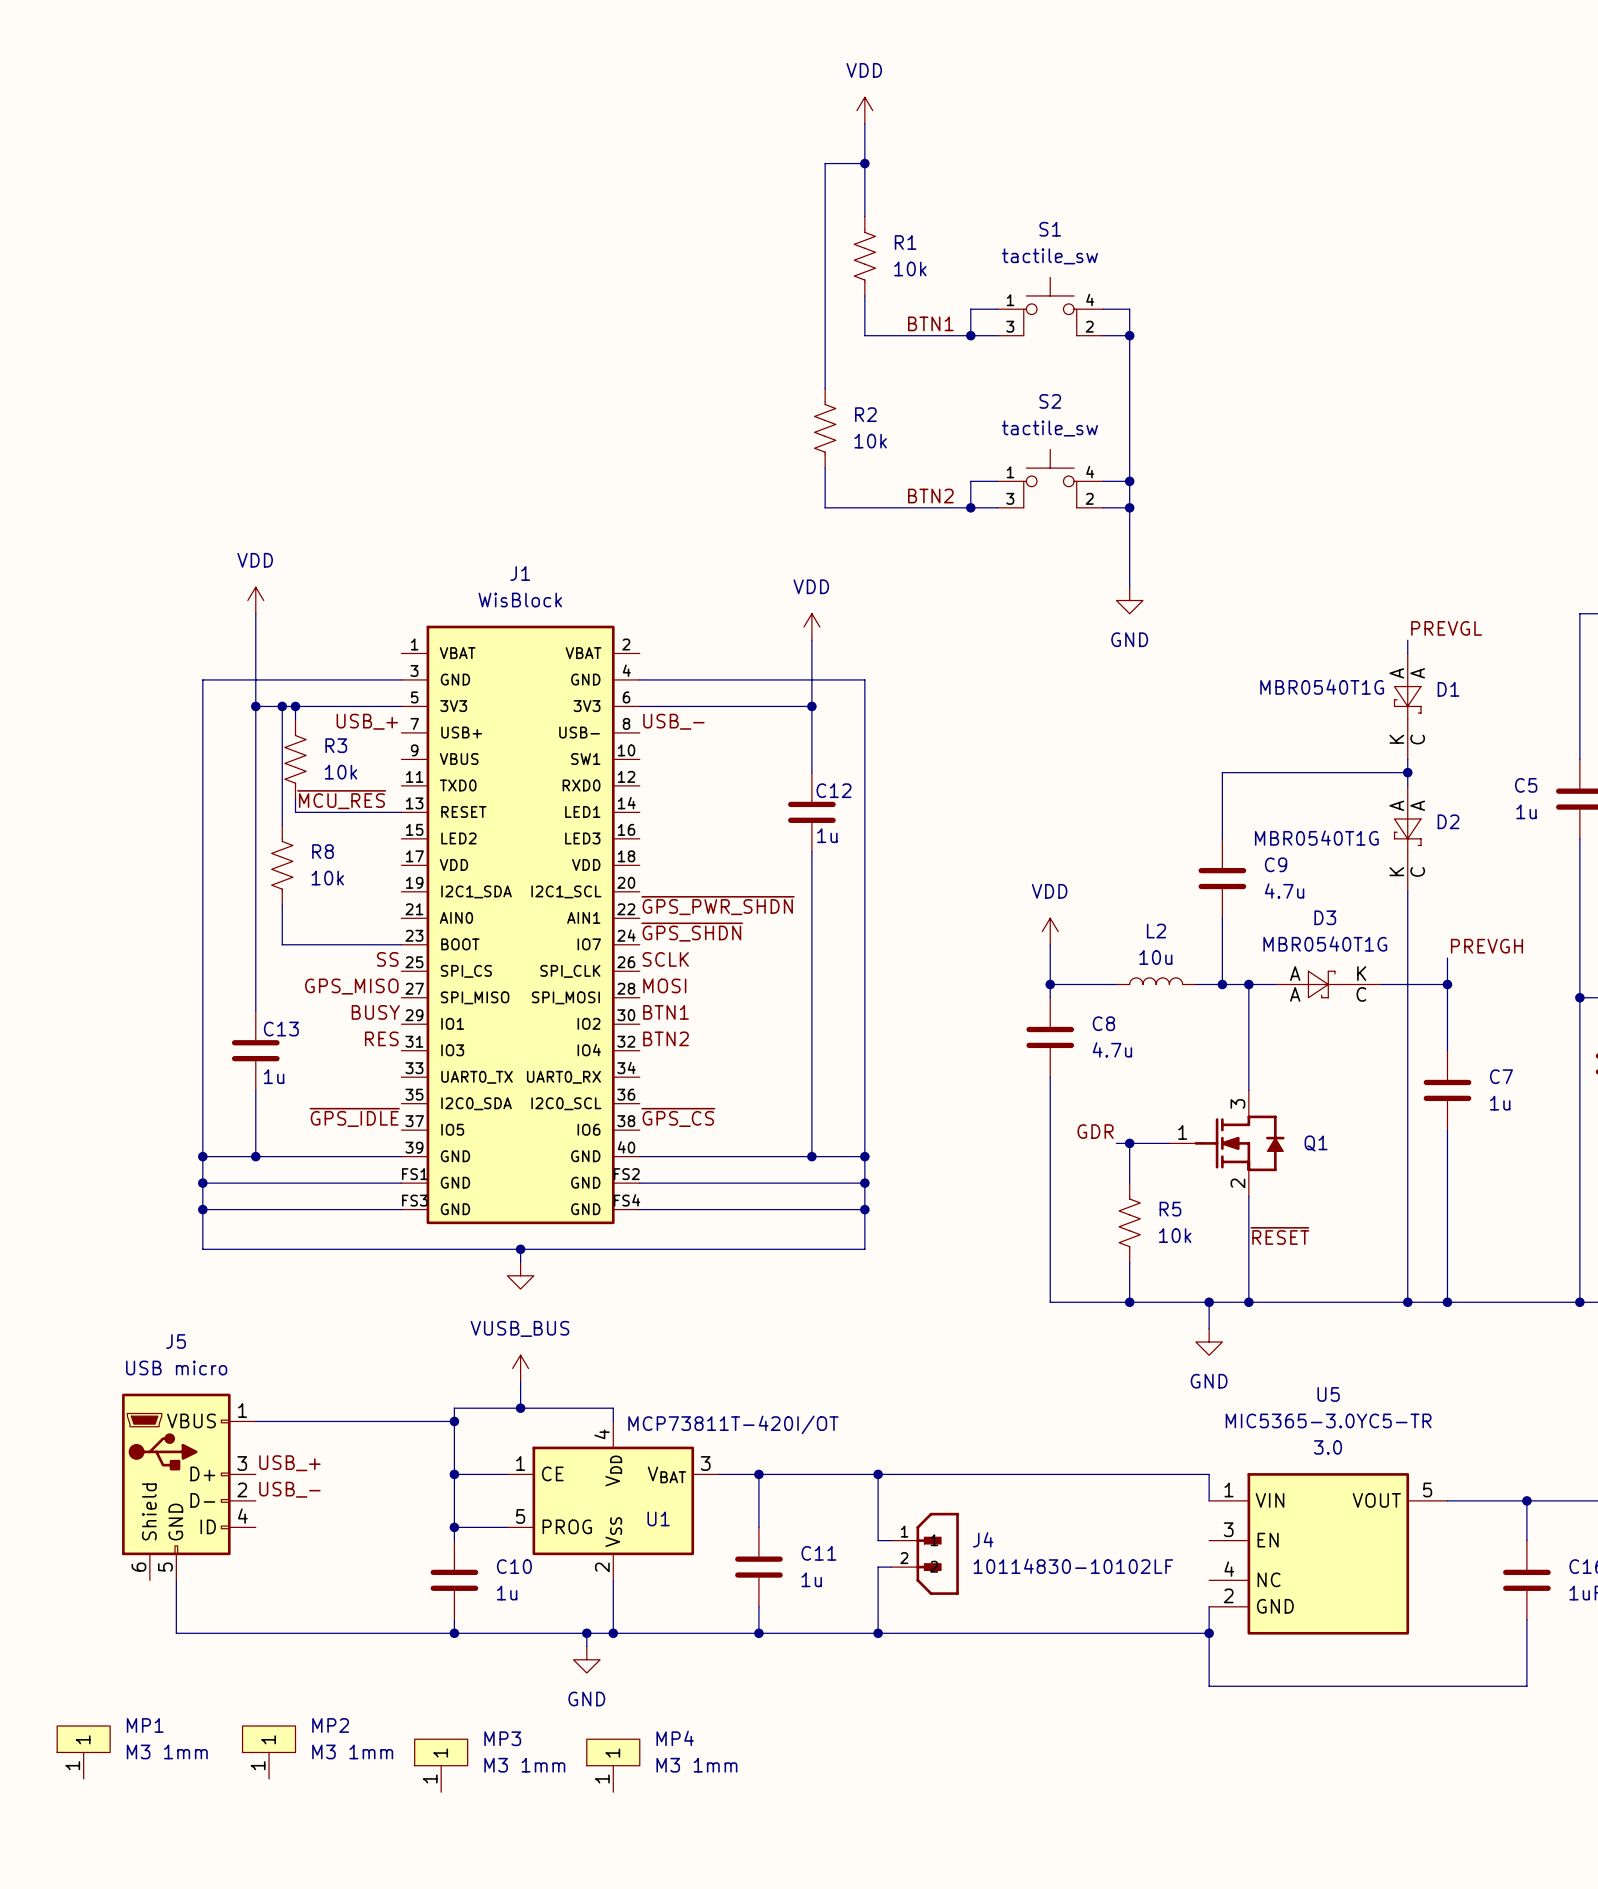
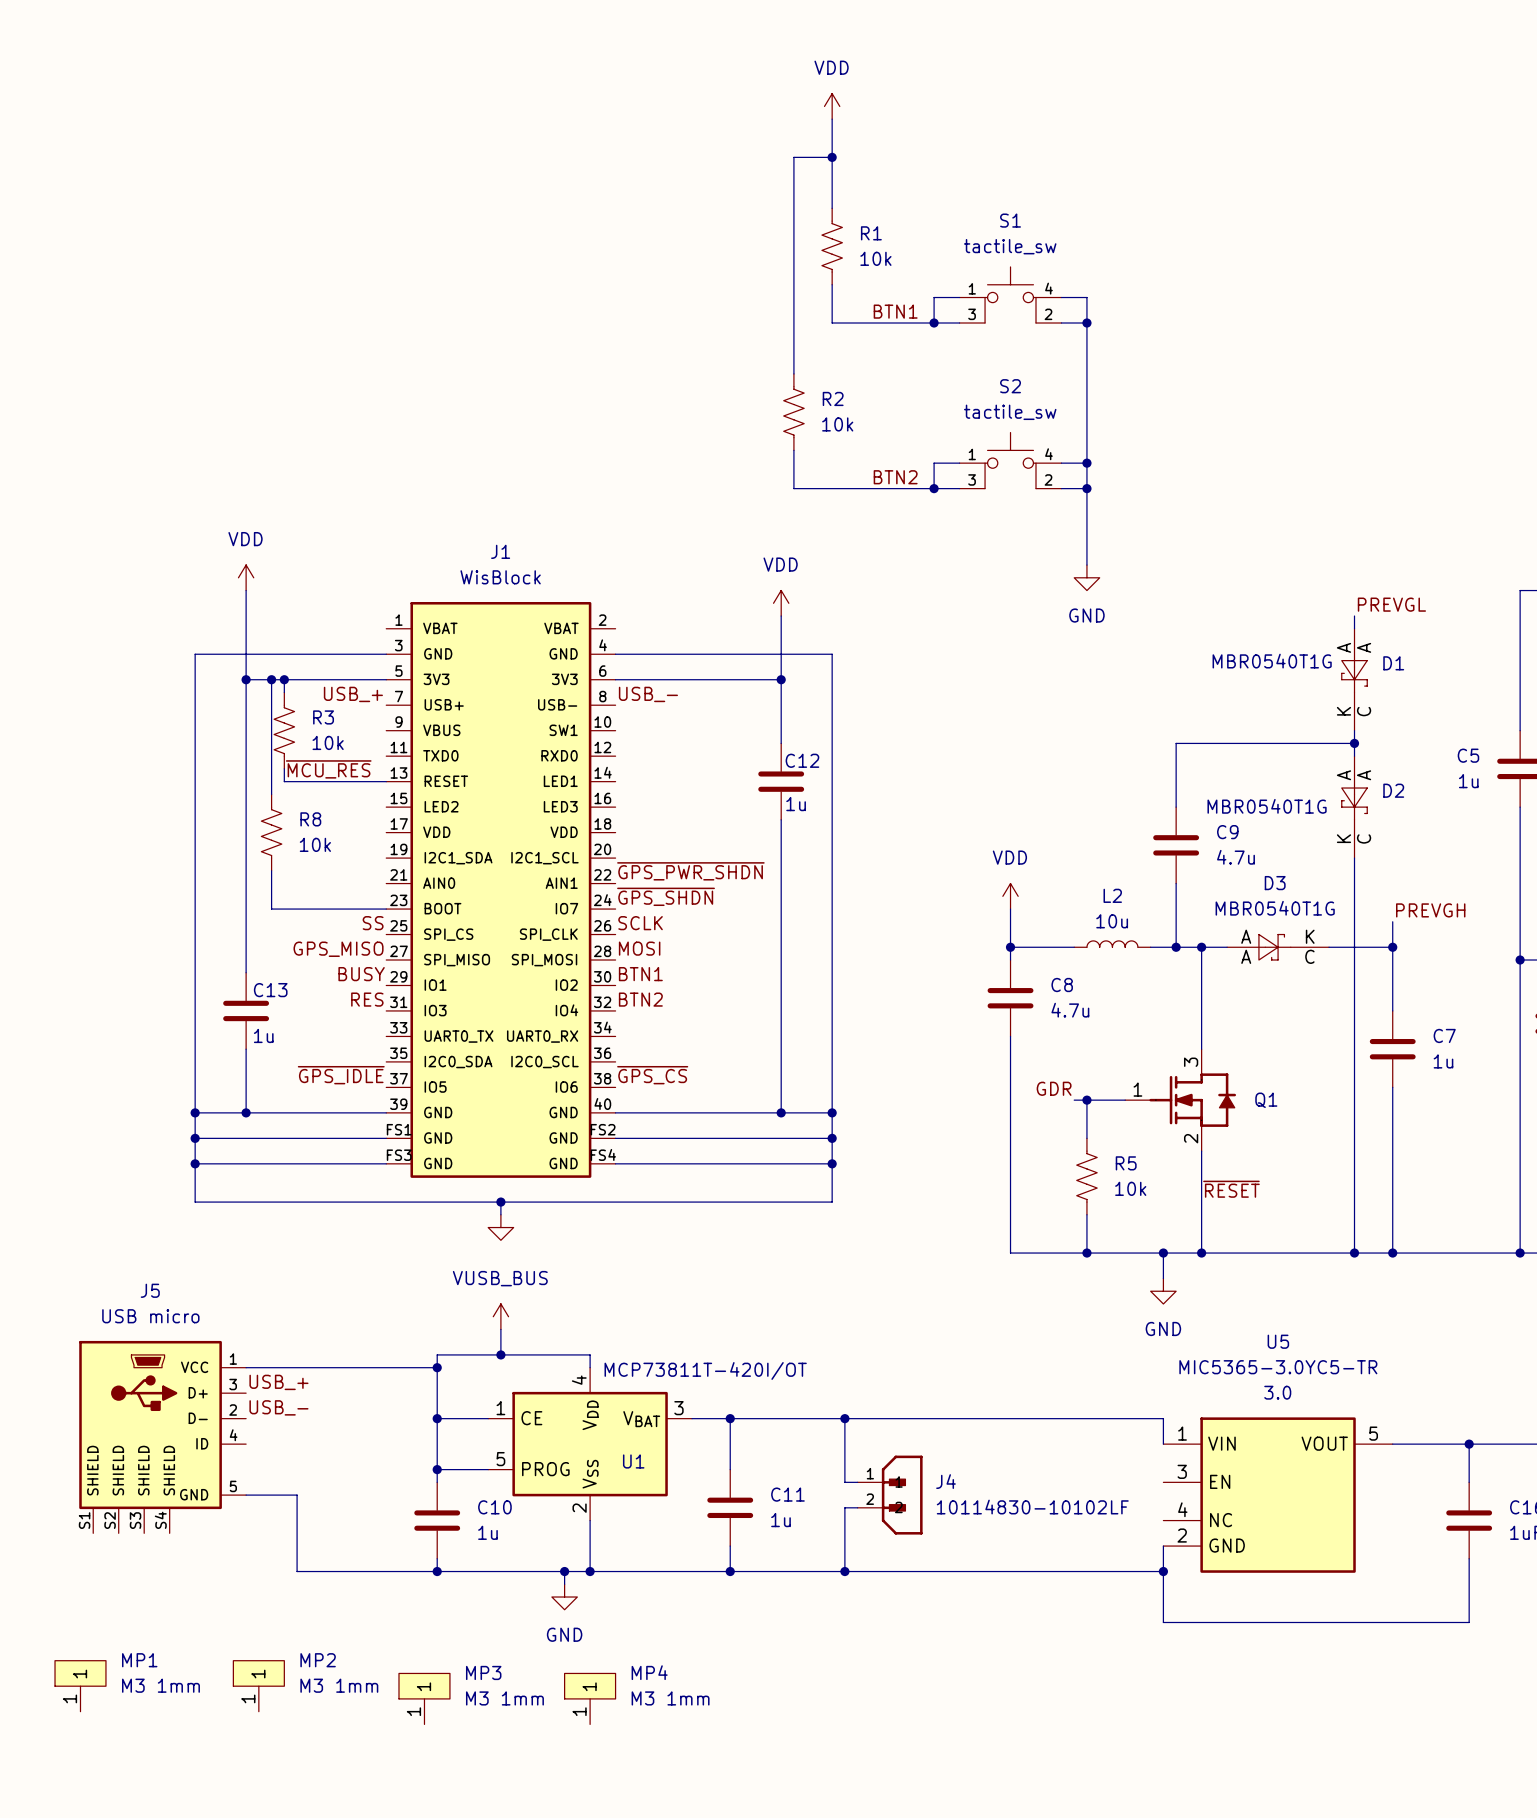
J5 symbol: [122, 1393, 256, 1581] -> [79, 1340, 247, 1534]
label: none -> USB_+ (278, 1382)
label: USB_+ (289, 1463) -> USB_- (278, 1407)
label: USB_- (289, 1489) -> none
wire: (176, 1580) (176, 1633) (308, 1633) -> (246, 1495) (297, 1495) (297, 1571)

